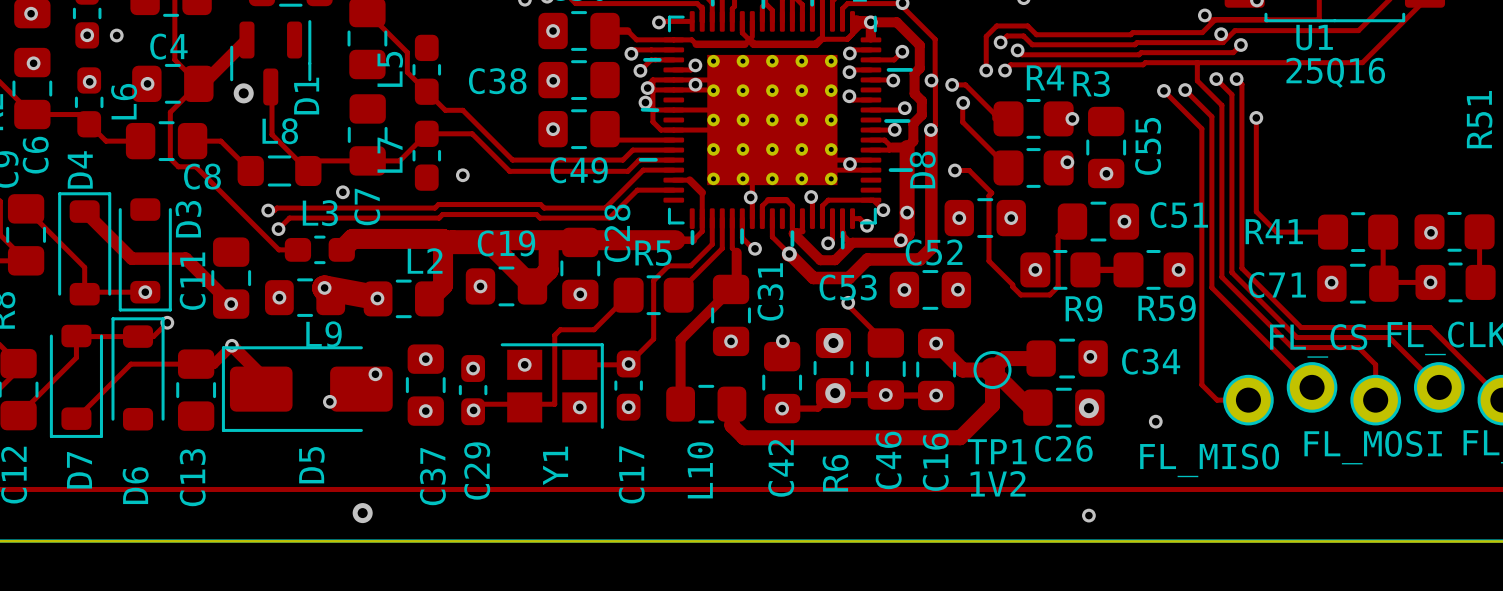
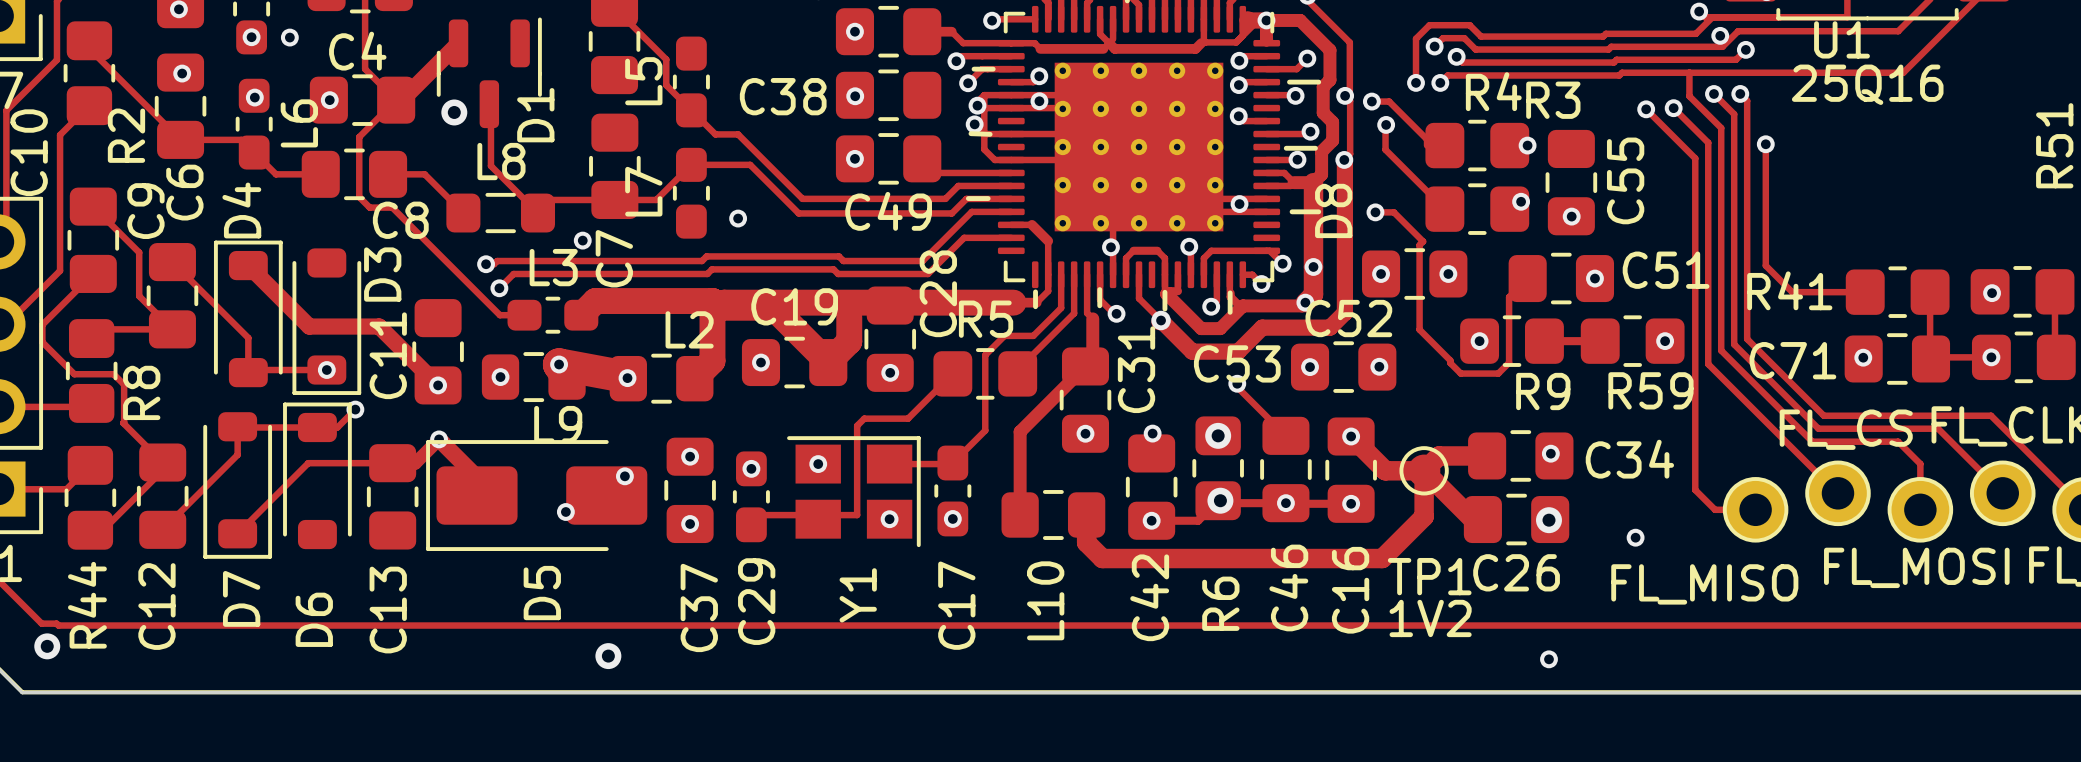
via: (628, 364) -> none
via: (473, 410) -> none

